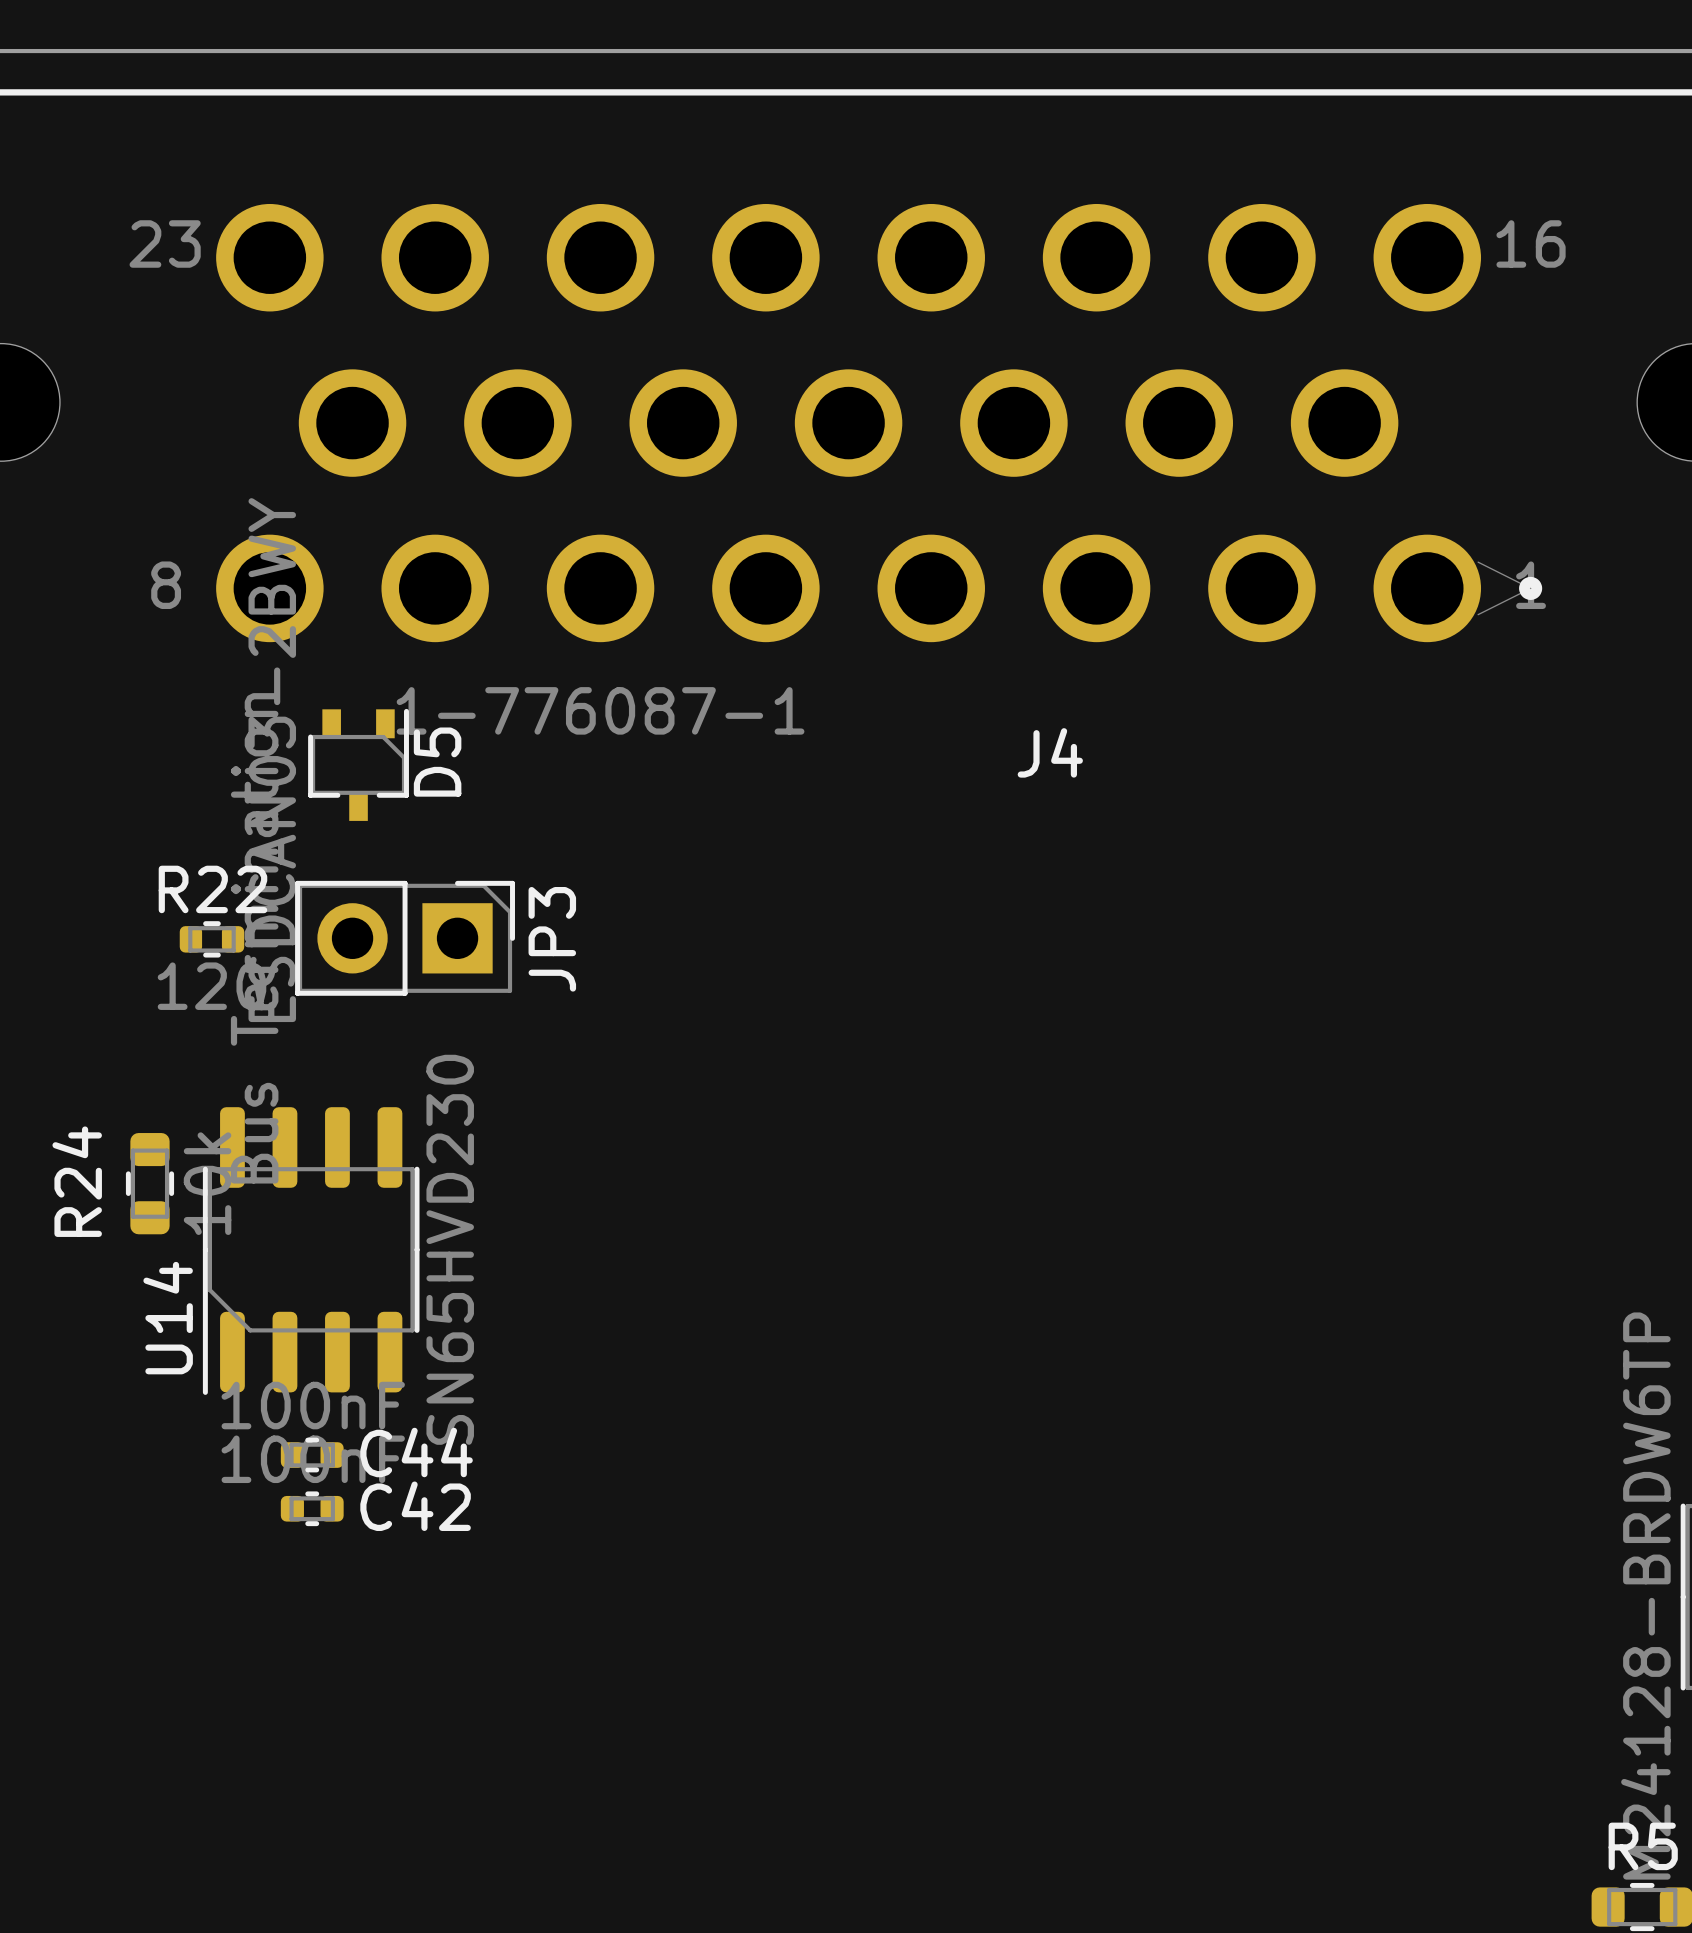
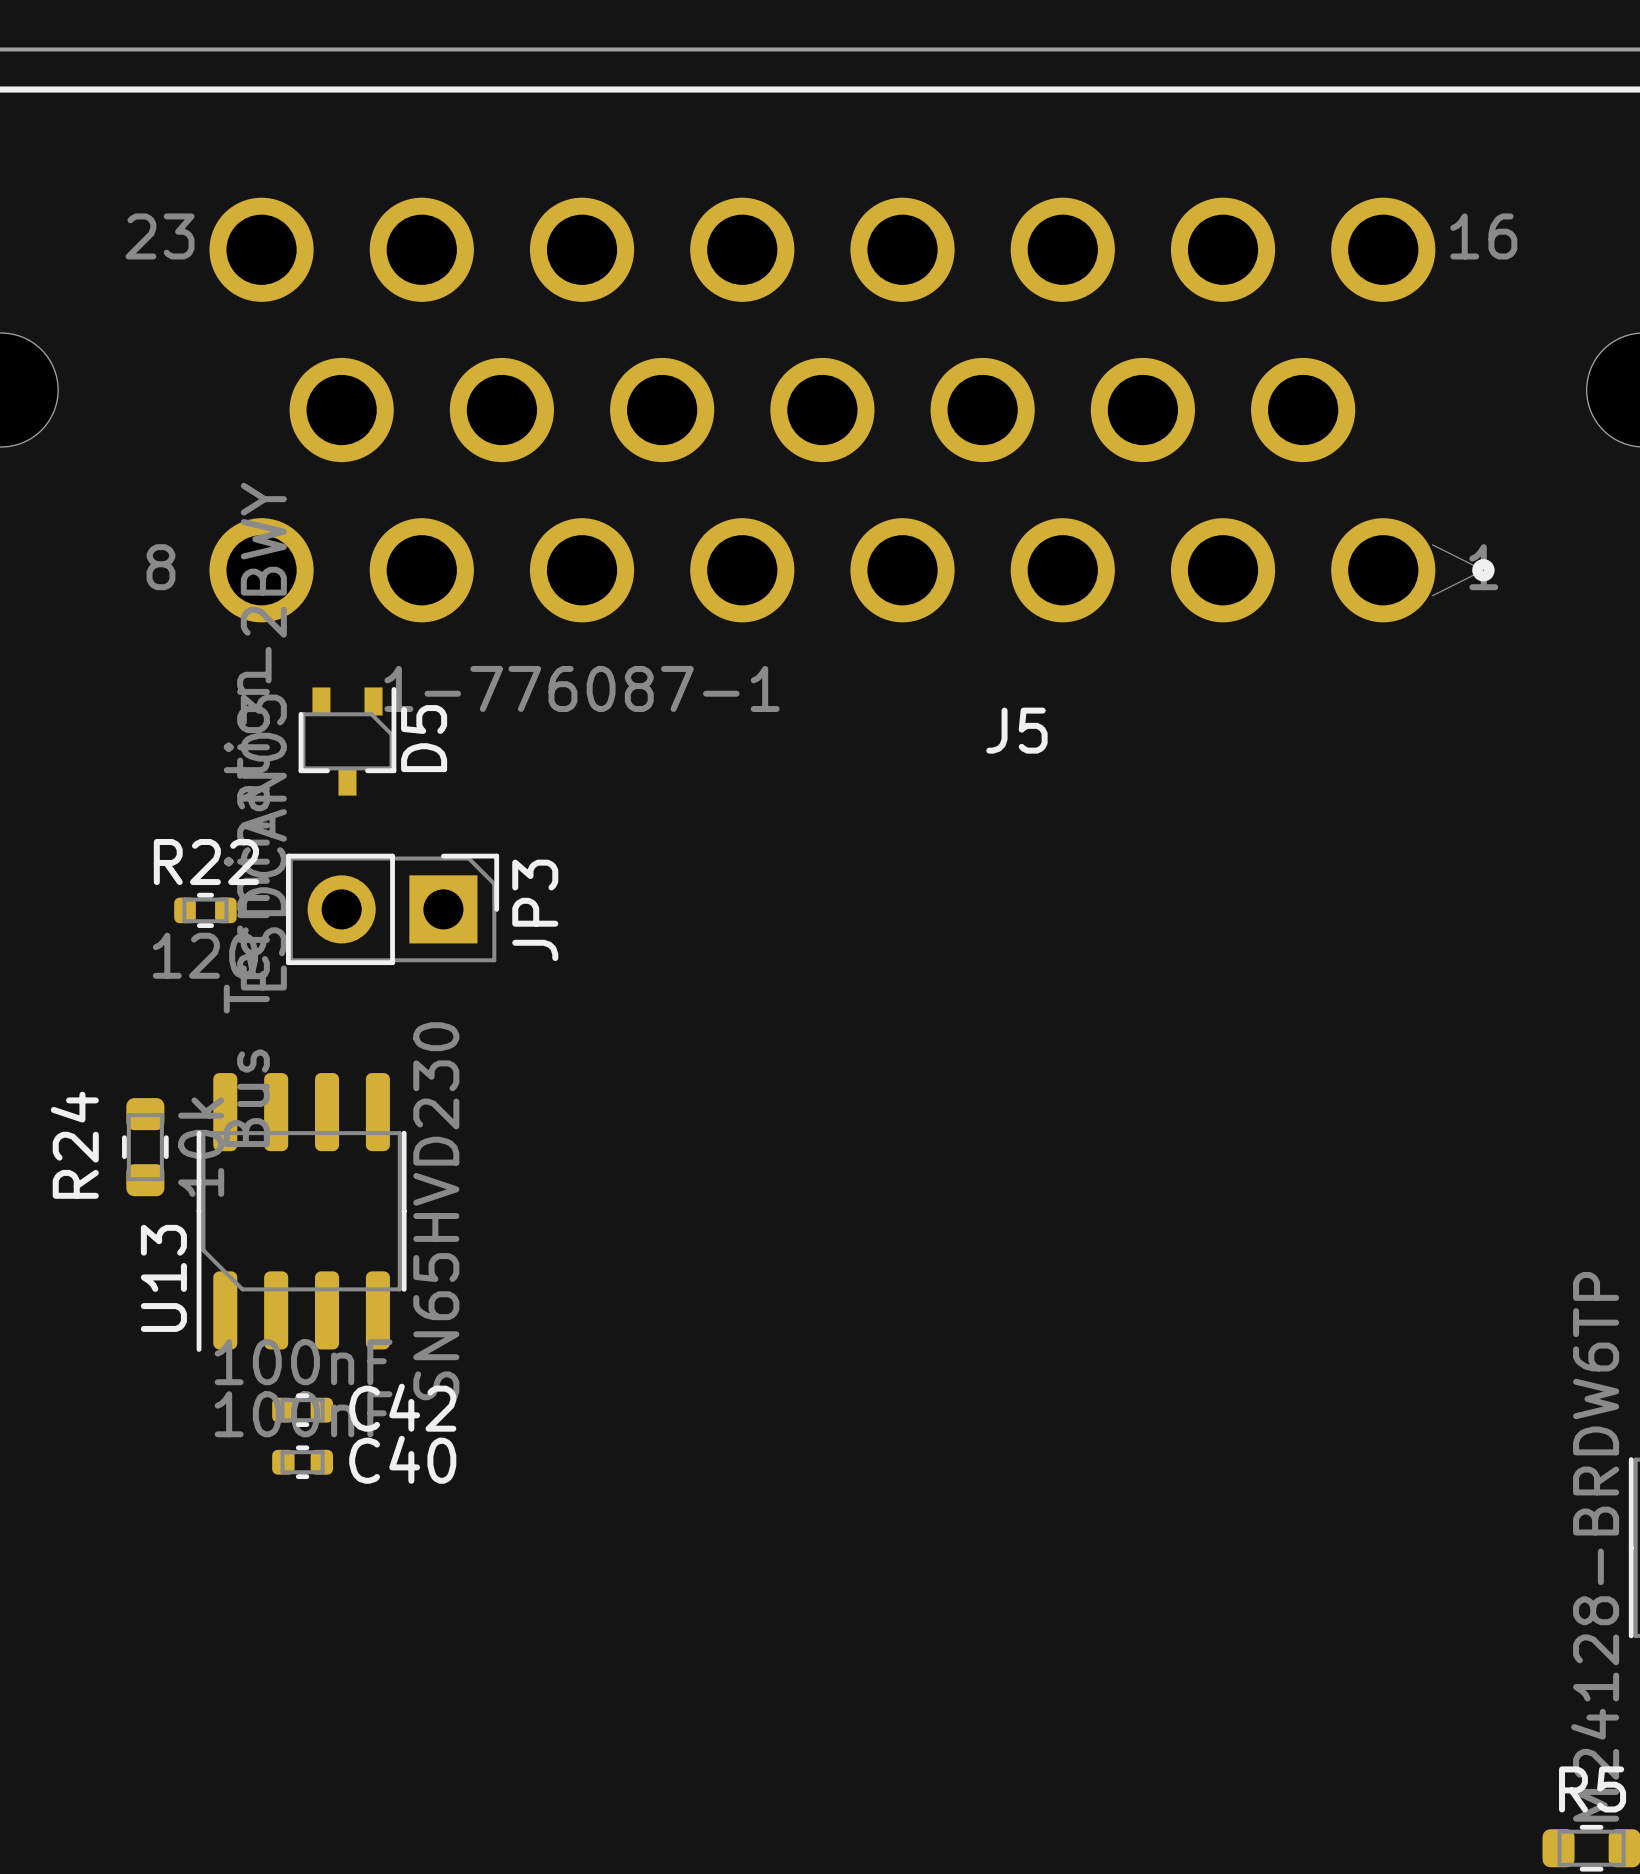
J4 name: J4 (1050, 752) -> J5 (1016, 730)
U14 name: U14 (168, 1318) -> U13 (163, 1278)
C44 name: C44 (416, 1452) -> C42 (402, 1407)
C42 name: C42 (415, 1506) -> C40 (402, 1459)

